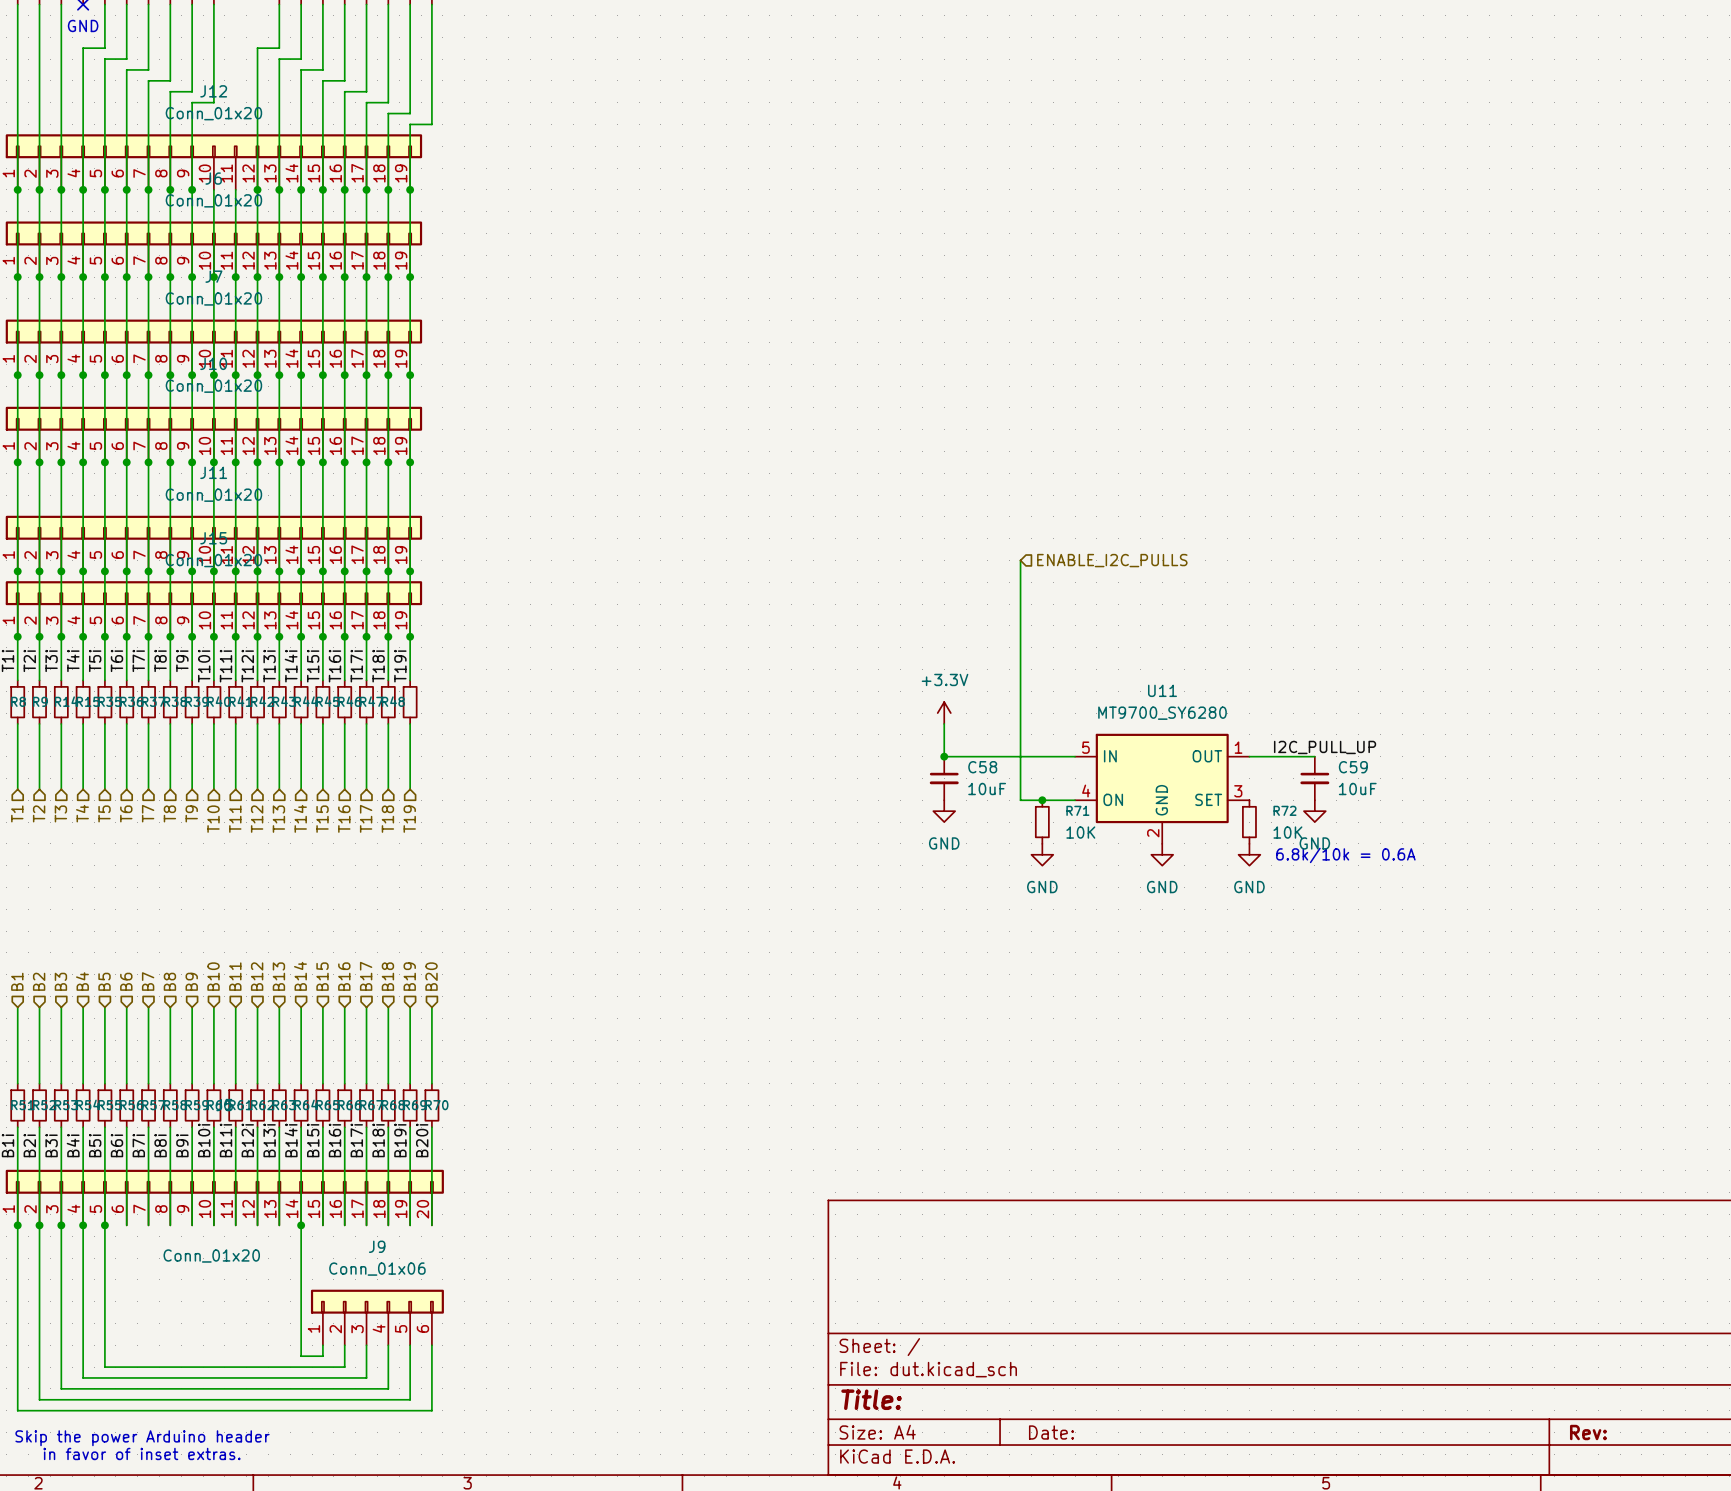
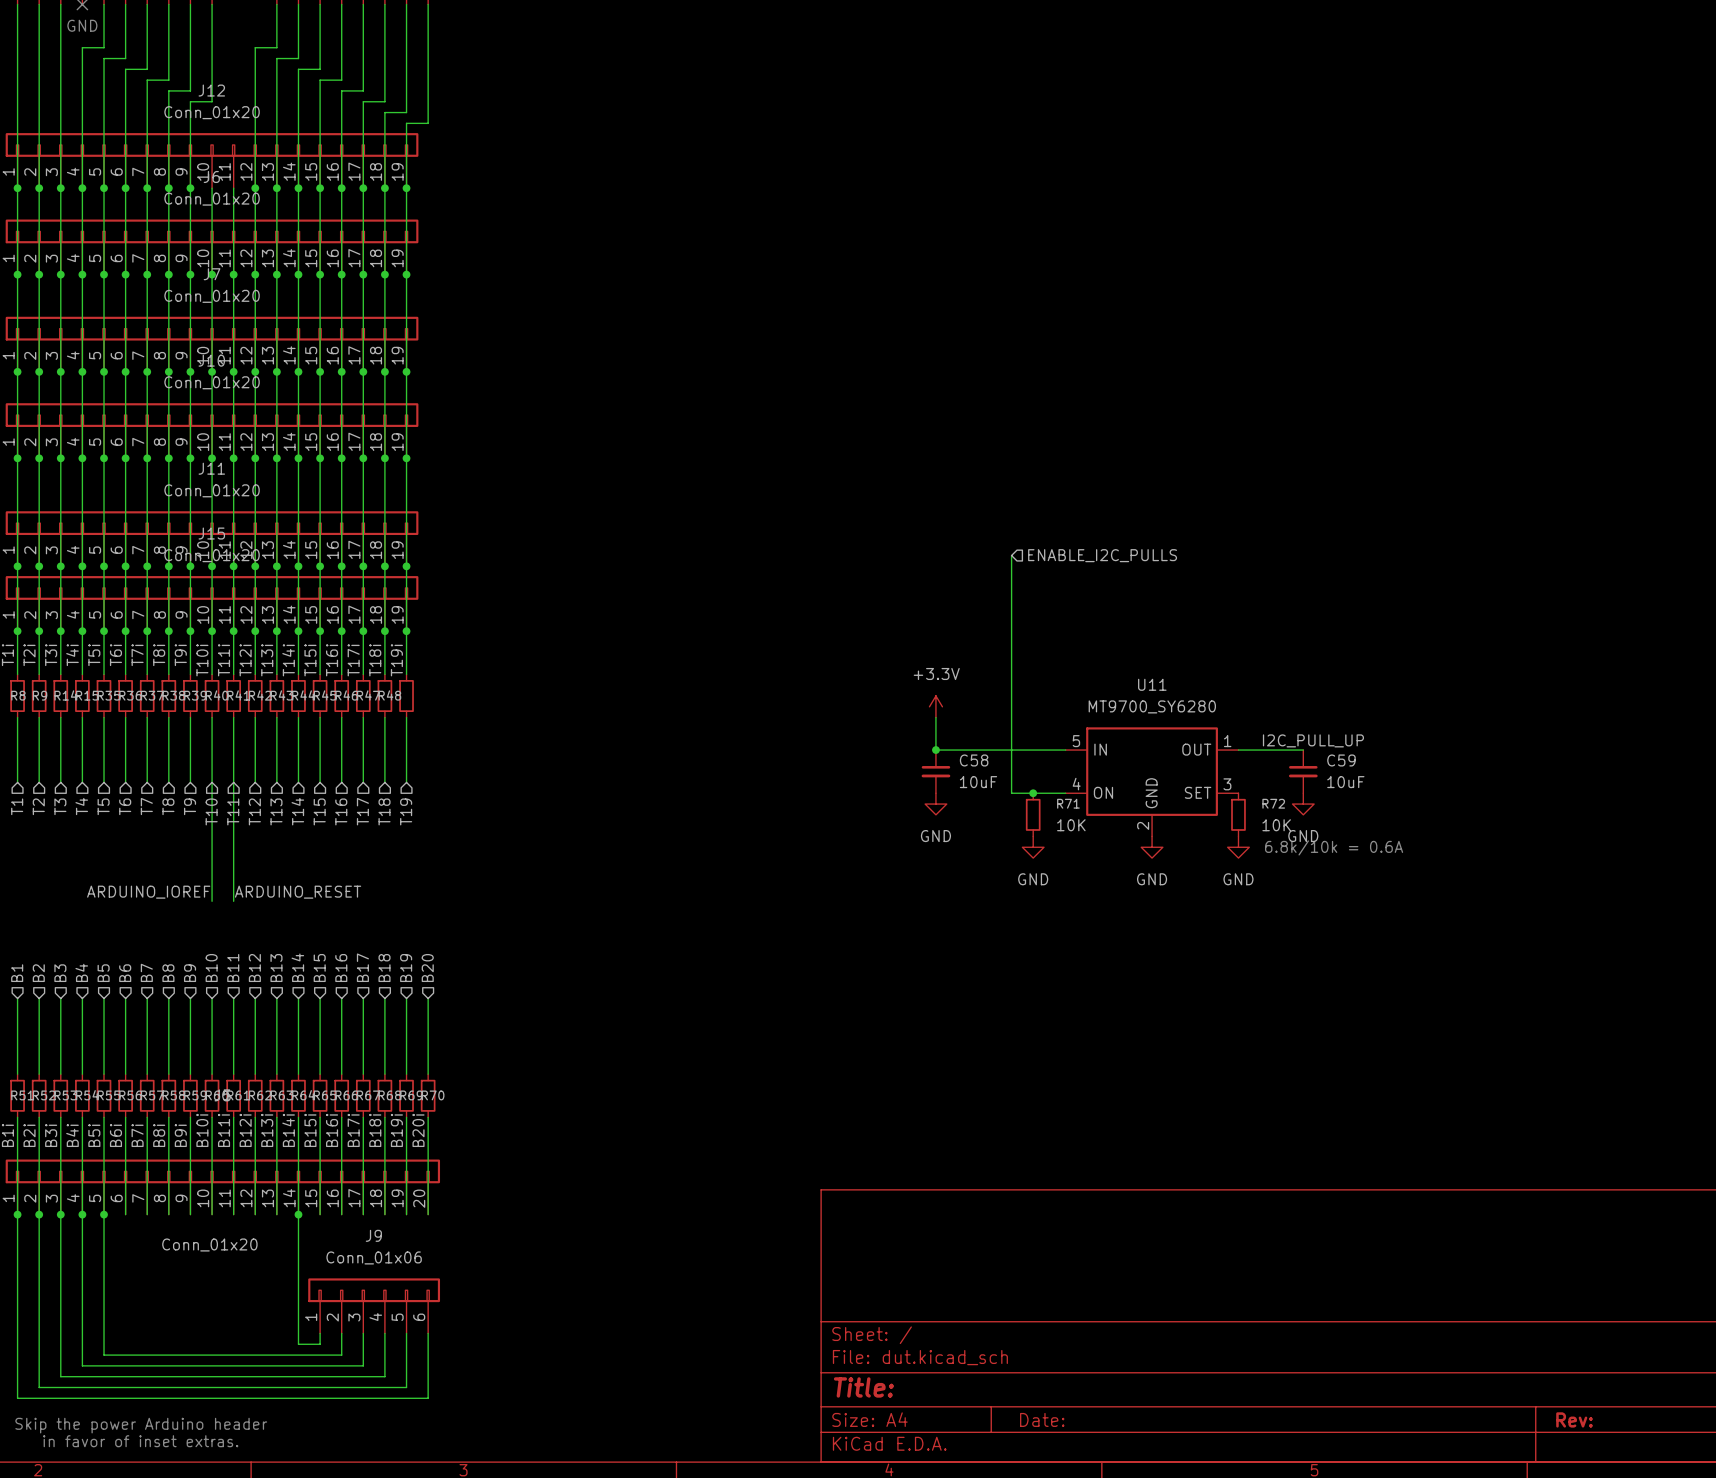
wire: none -> (212, 782) (212, 901)
wire: none -> (233, 782) (233, 901)
label: none -> ARDUINO_IOREF (148, 892)
label: none -> ARDUINO_RESET (298, 892)

